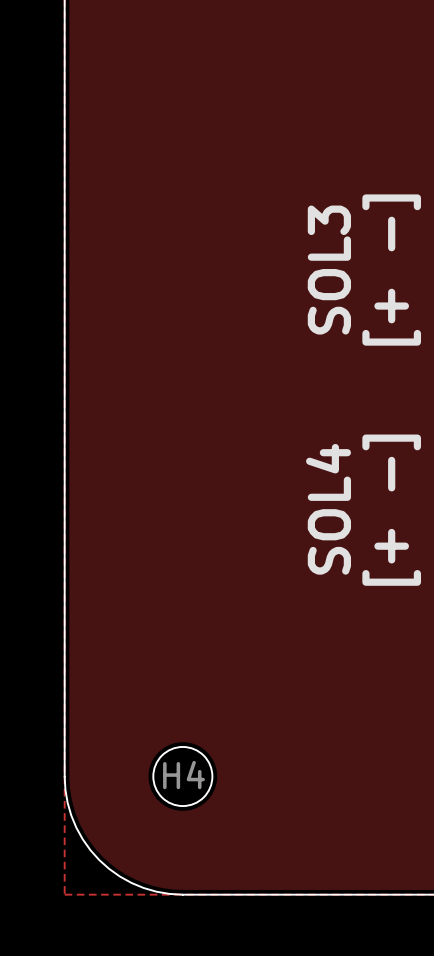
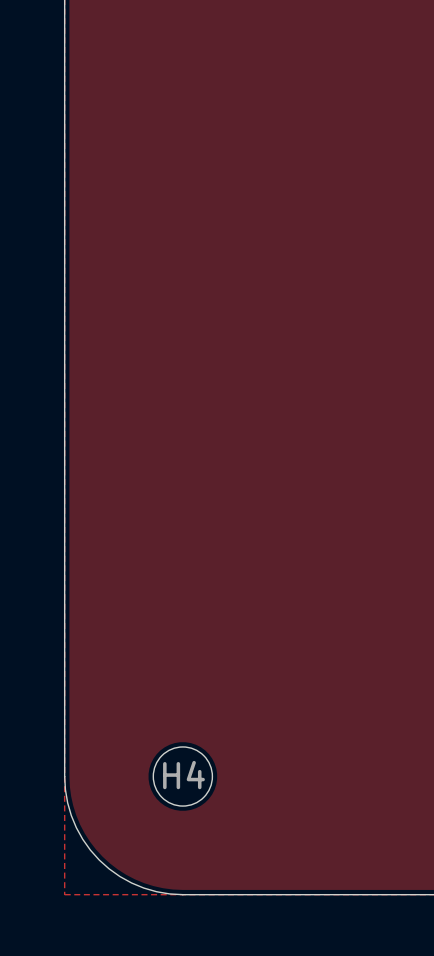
text: SOL3 (329, 270) -> none
text: [+ -] (391, 270) -> none
text: SOL4 (328, 509) -> none
text: [+ -] (391, 510) -> none

